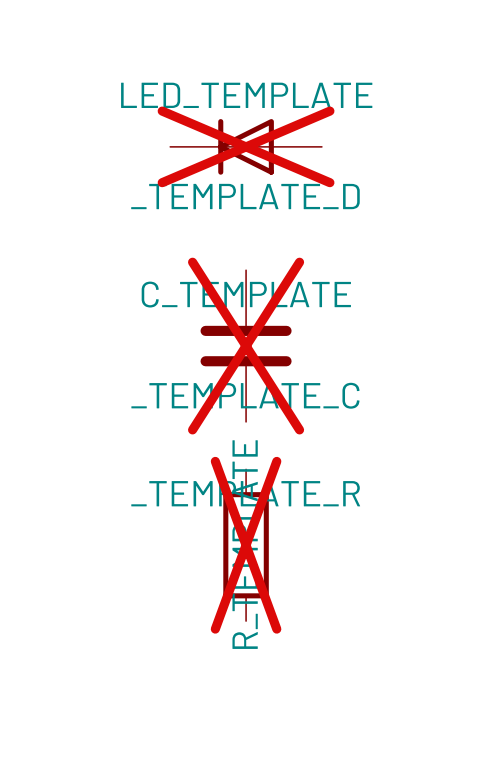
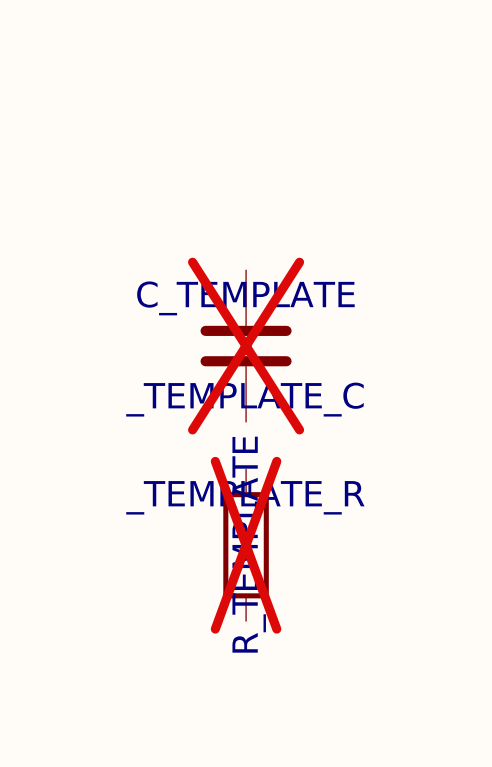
_TEMPLATE_D: LED_TEMPLATE (246, 146) -> none

